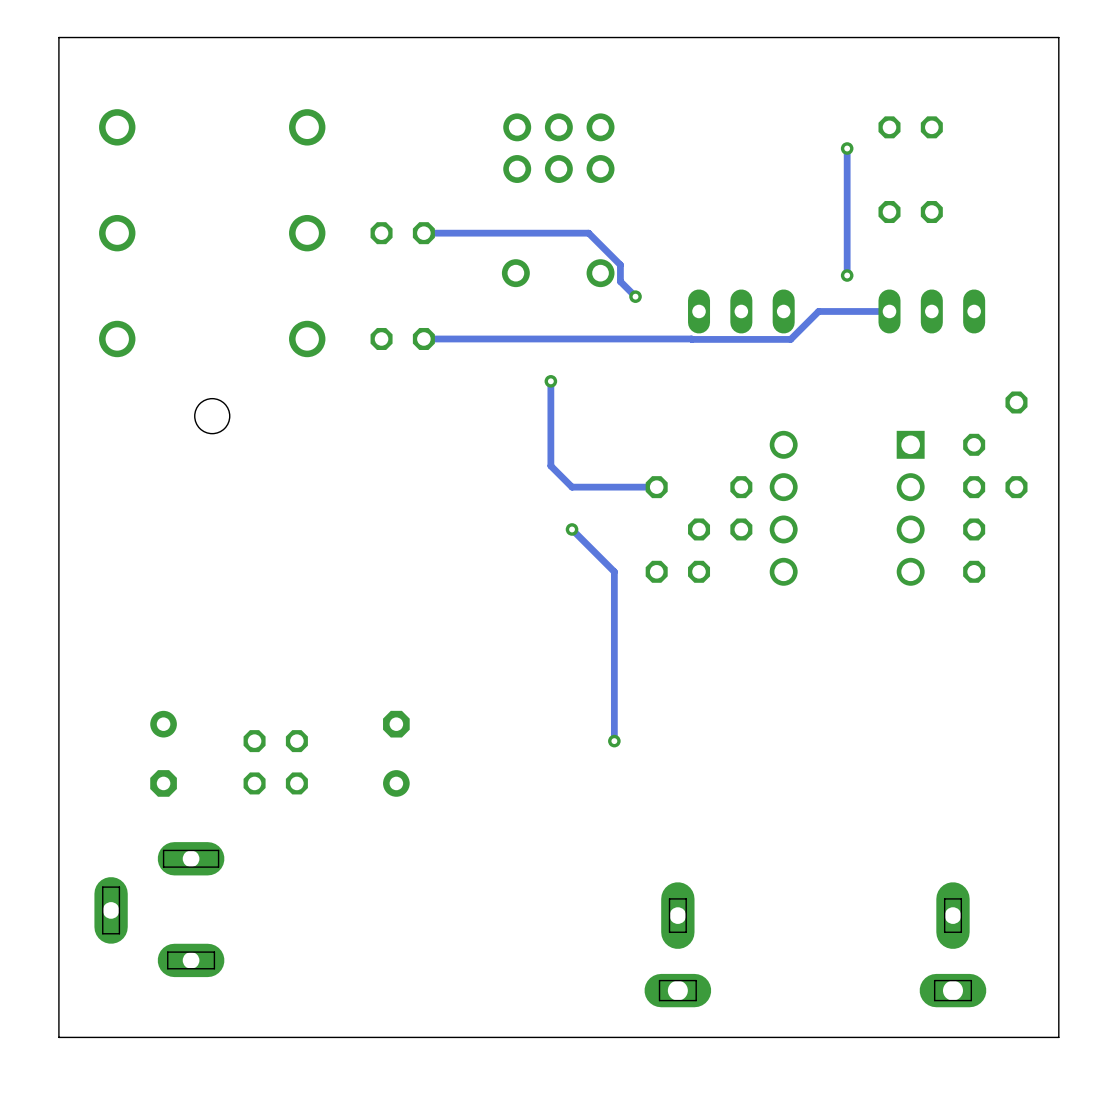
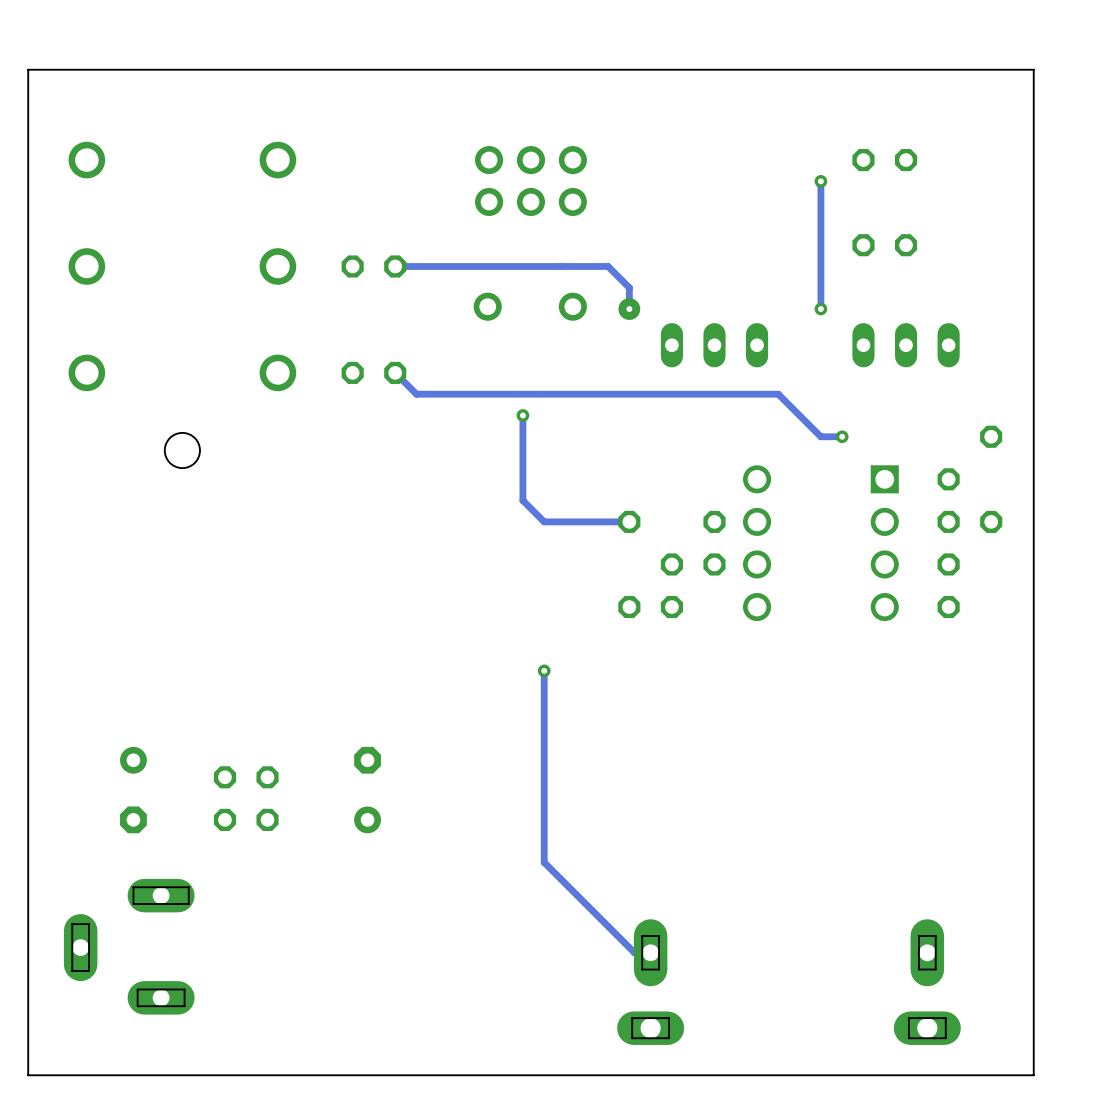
track: (588, 233) (620, 264) (620, 281) (635, 296) -> (560, 266) (608, 266) (629, 287) (629, 309)
via: none -> (629, 309)
via: (635, 296) -> none
track: (889, 311) (818, 311) (790, 339) (423, 338) -> (842, 436) (820, 436) (778, 394) (416, 394) (395, 372)
via: none -> (842, 436)
track: (572, 529) (614, 571) (614, 741) -> none
via: (572, 529) -> none
track: none -> (544, 670) (544, 862) (634, 952) (650, 952)
via: none -> (544, 670)
via: (614, 741) -> none

